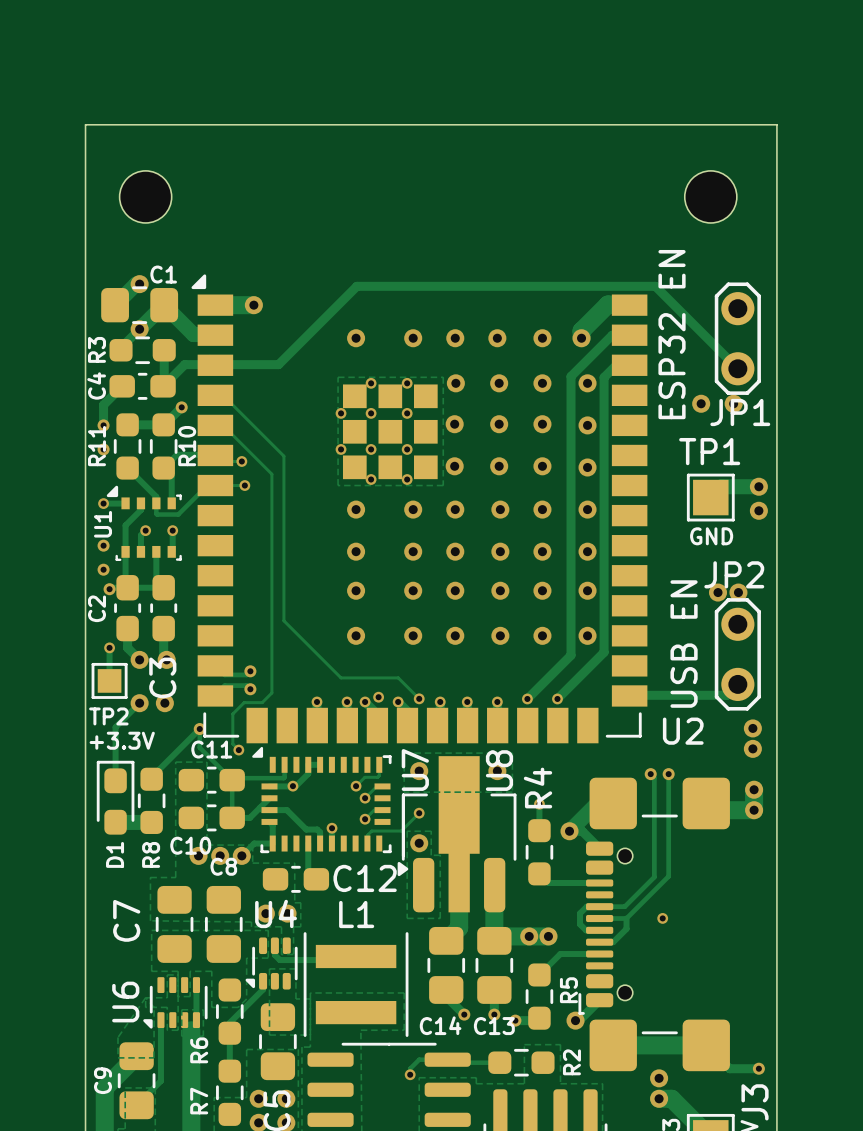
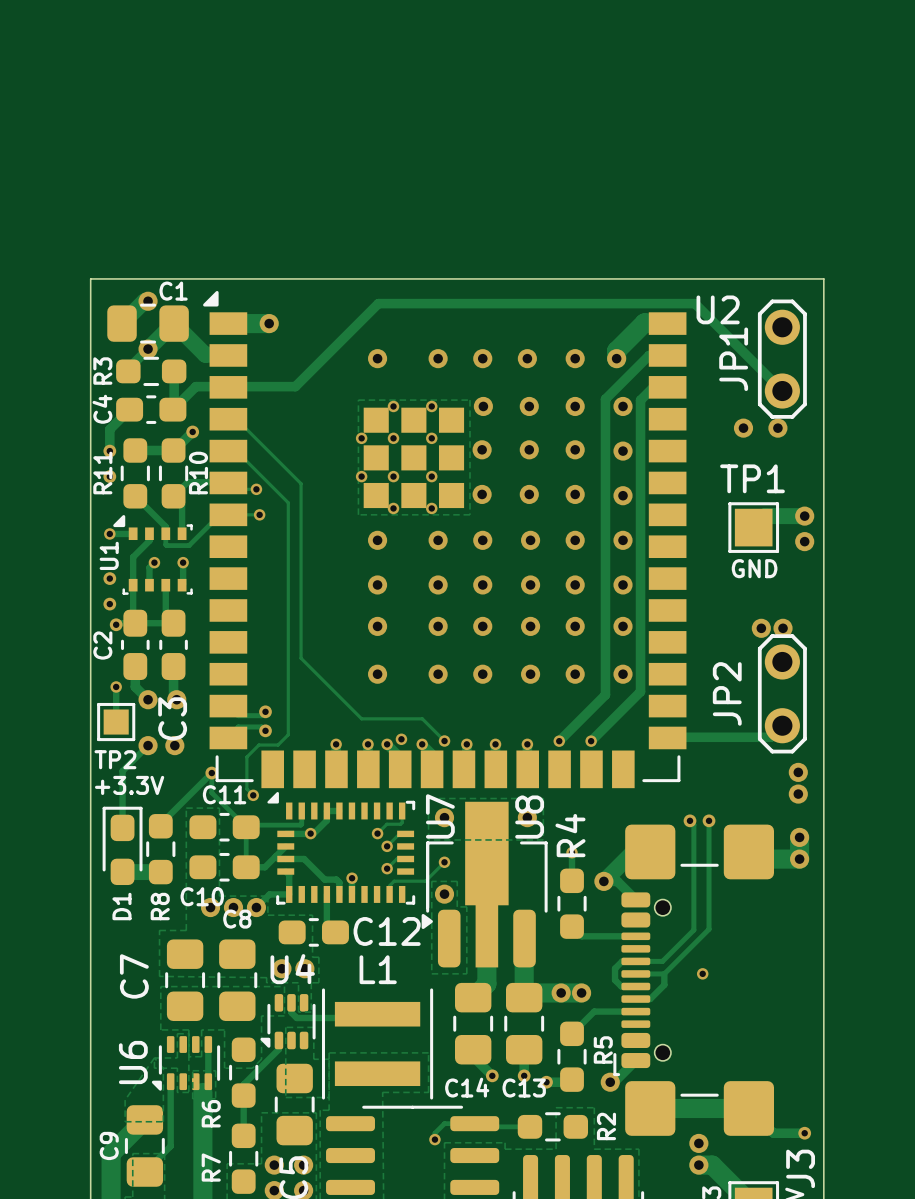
part: (145, 196) -> none
part: (710, 196) -> none
board edge: (85, 263) (85, 124) (776, 124) (776, 263) -> (90, 278) (823, 278)
text: ESP32 EN (672, 334) -> none
JP1 name rotation: 0° (740, 412) -> 90° counterclockwise (733, 359)
JP1 name position: JP1 (740, 412) -> JP1 (733, 359)
JP2 name rotation: 0° (734, 574) -> 90° counterclockwise (727, 693)
JP2 name position: JP2 (734, 574) -> JP2 (727, 693)
text: USB EN (684, 644) -> none
U2 name position: U2 (683, 731) -> U2 (718, 309)

